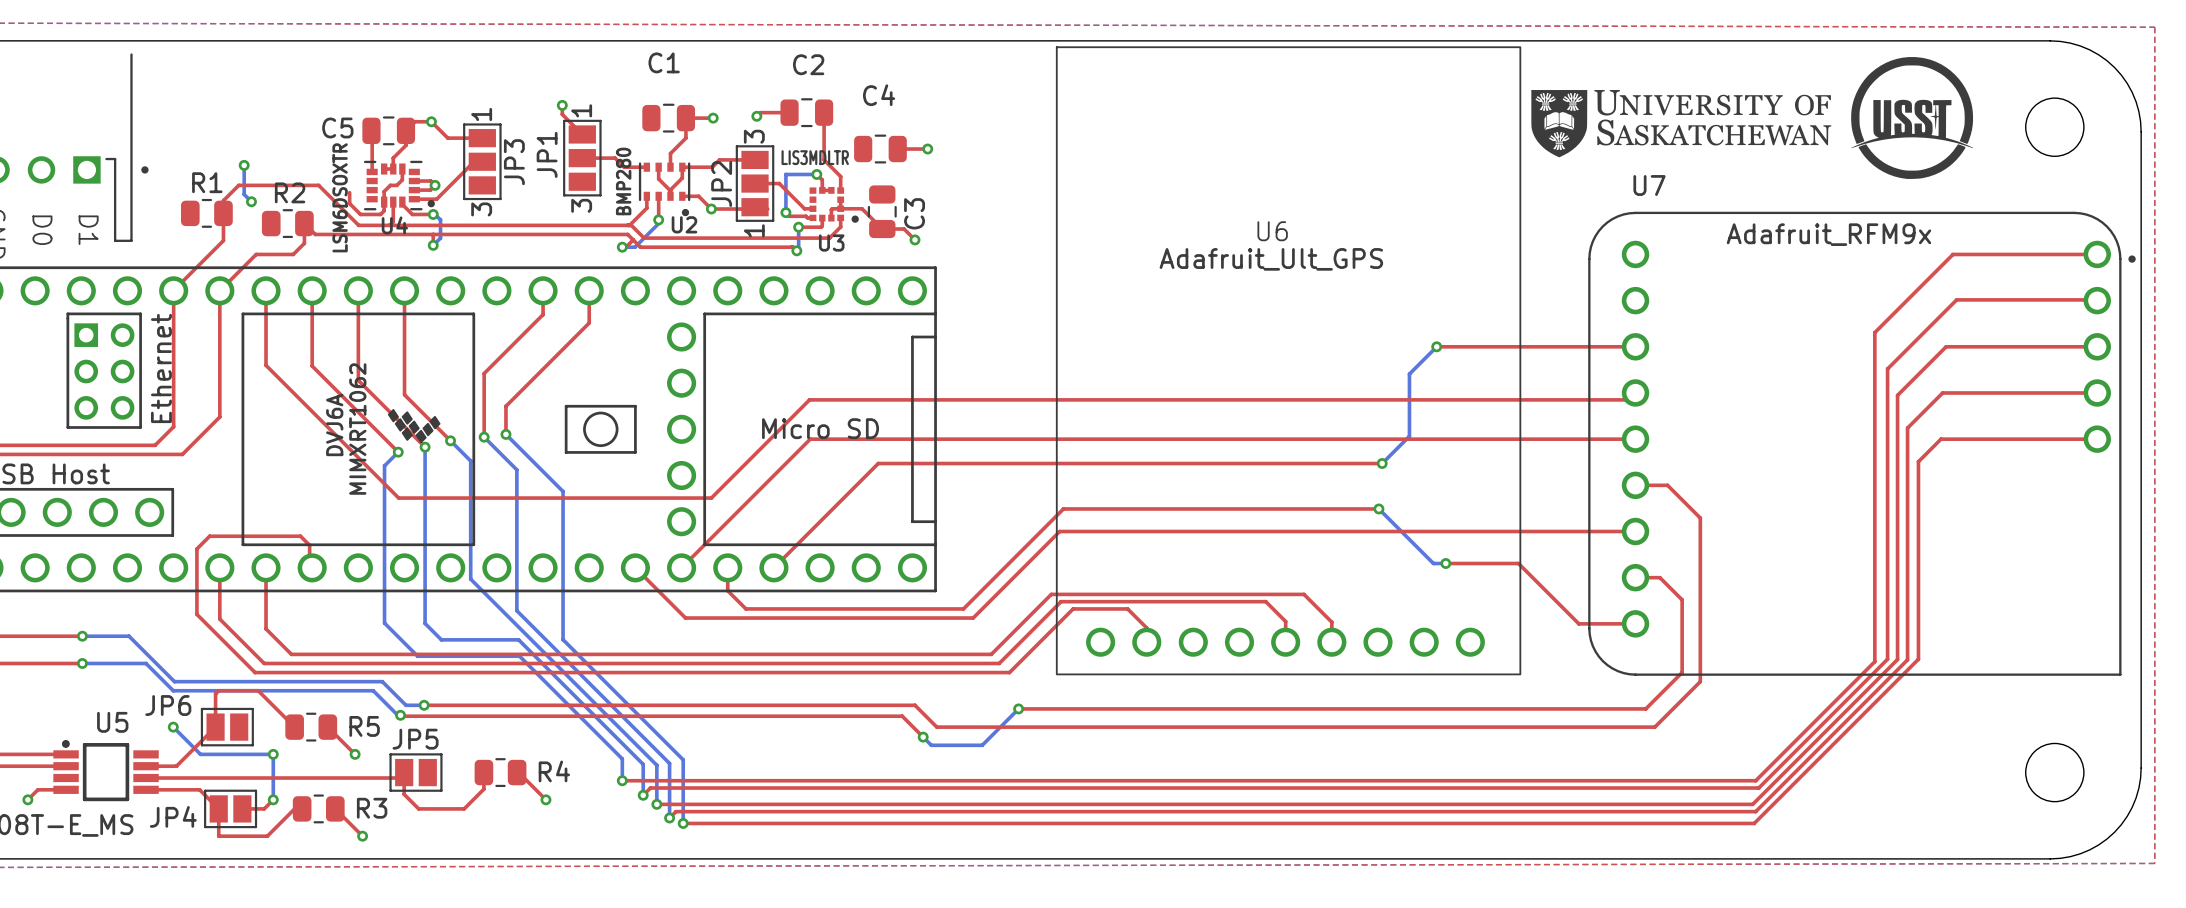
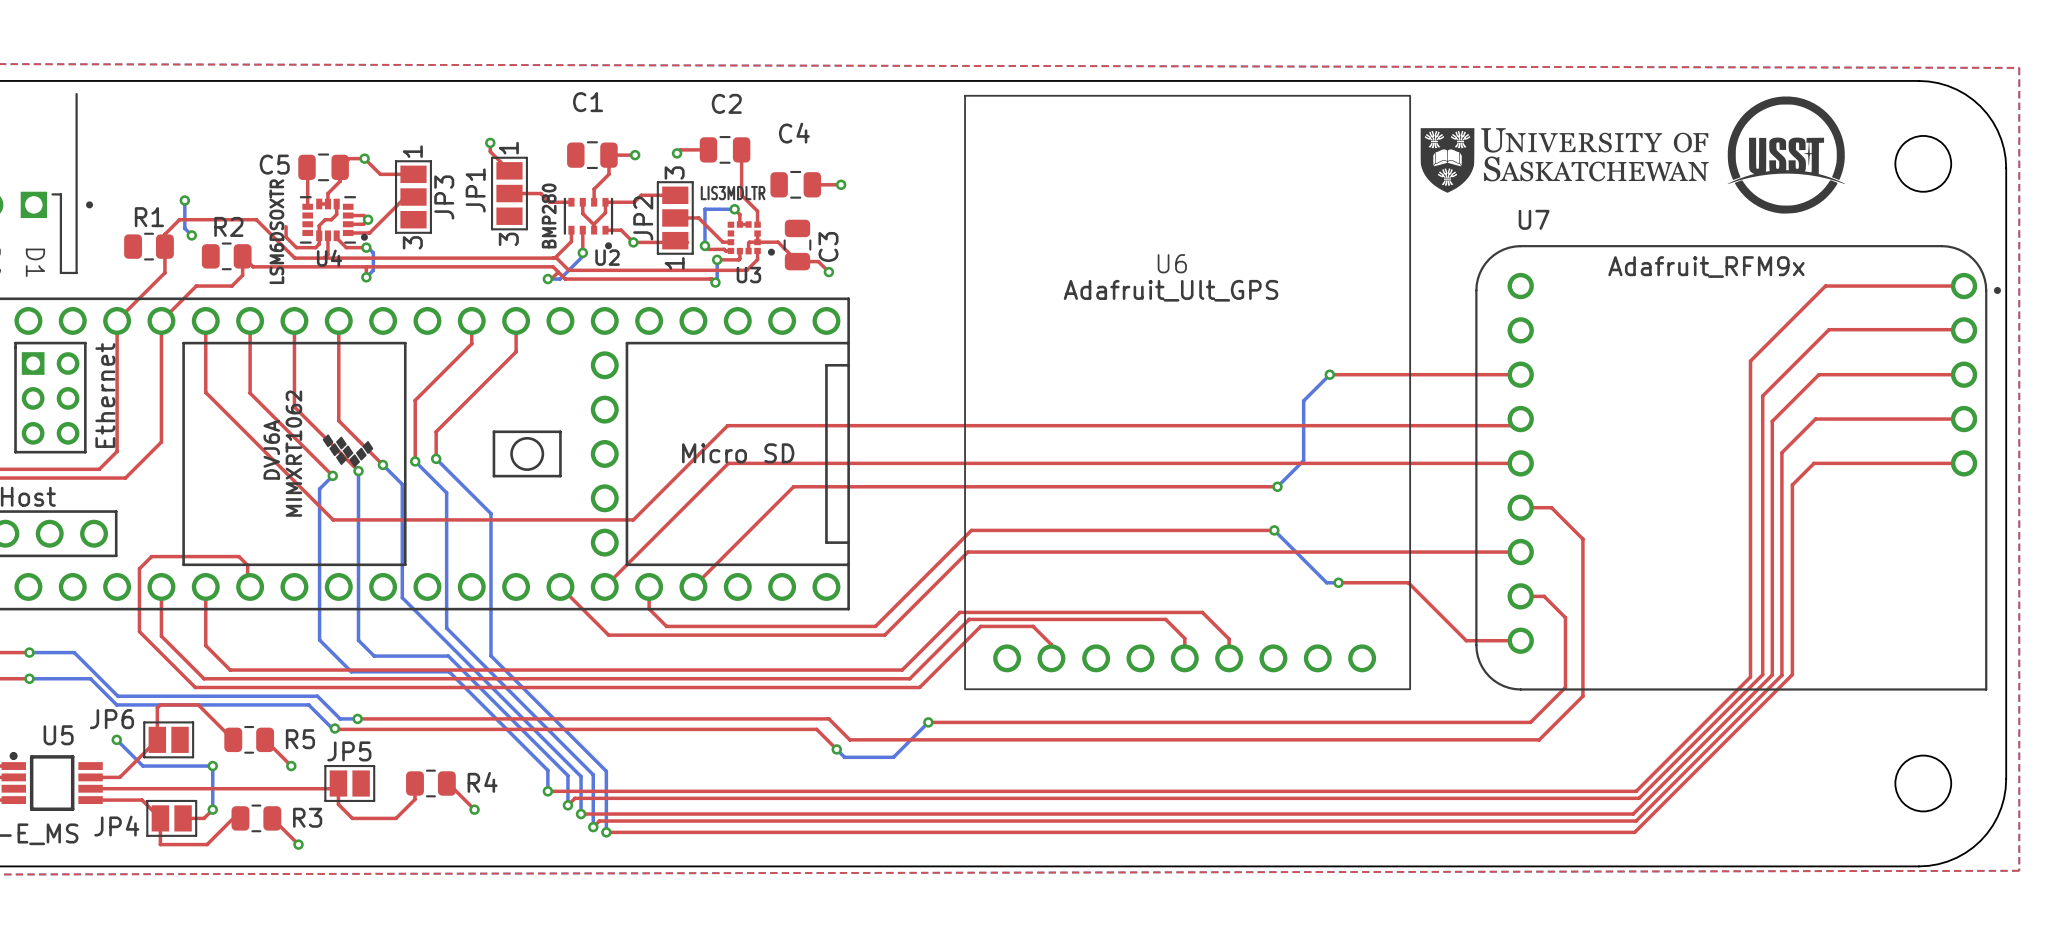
U6 footprint: [1055, 46, 1522, 676] -> [964, 94, 1412, 691]

